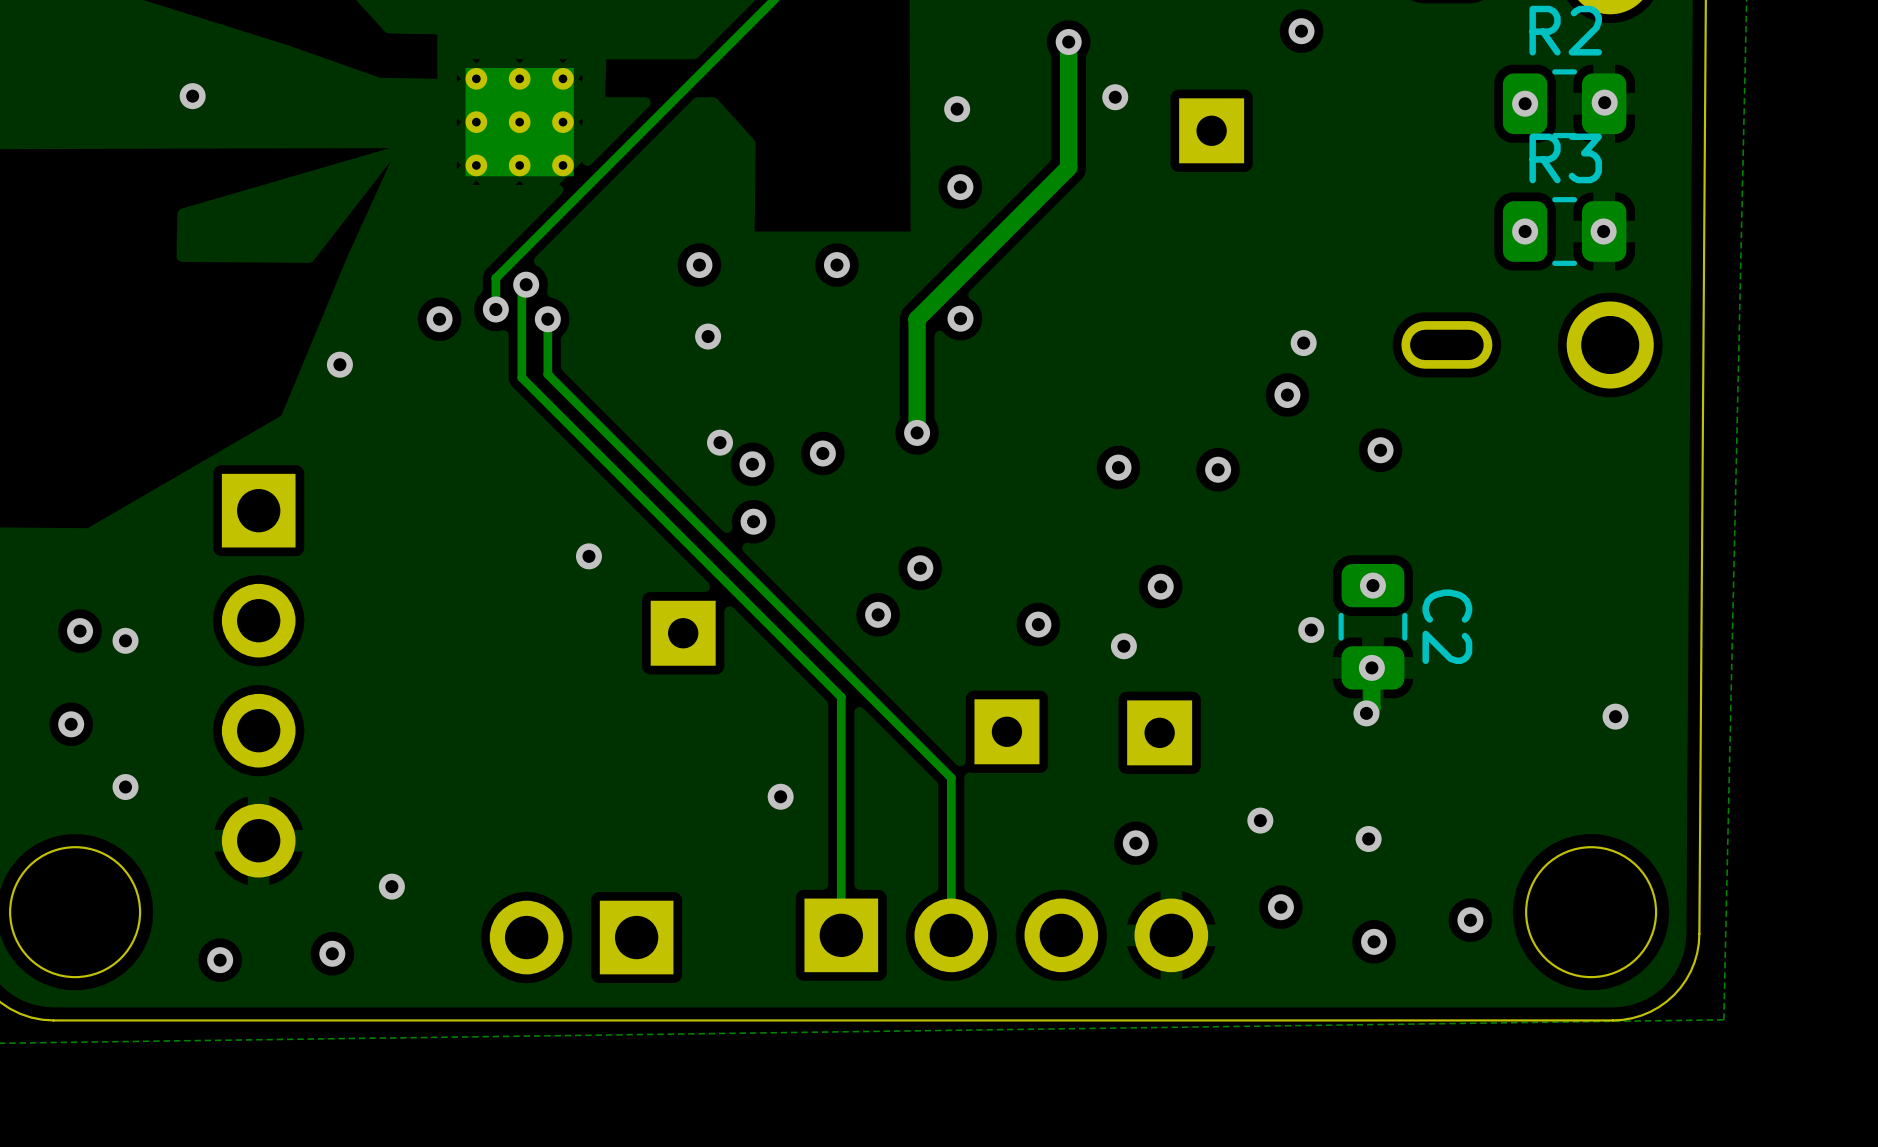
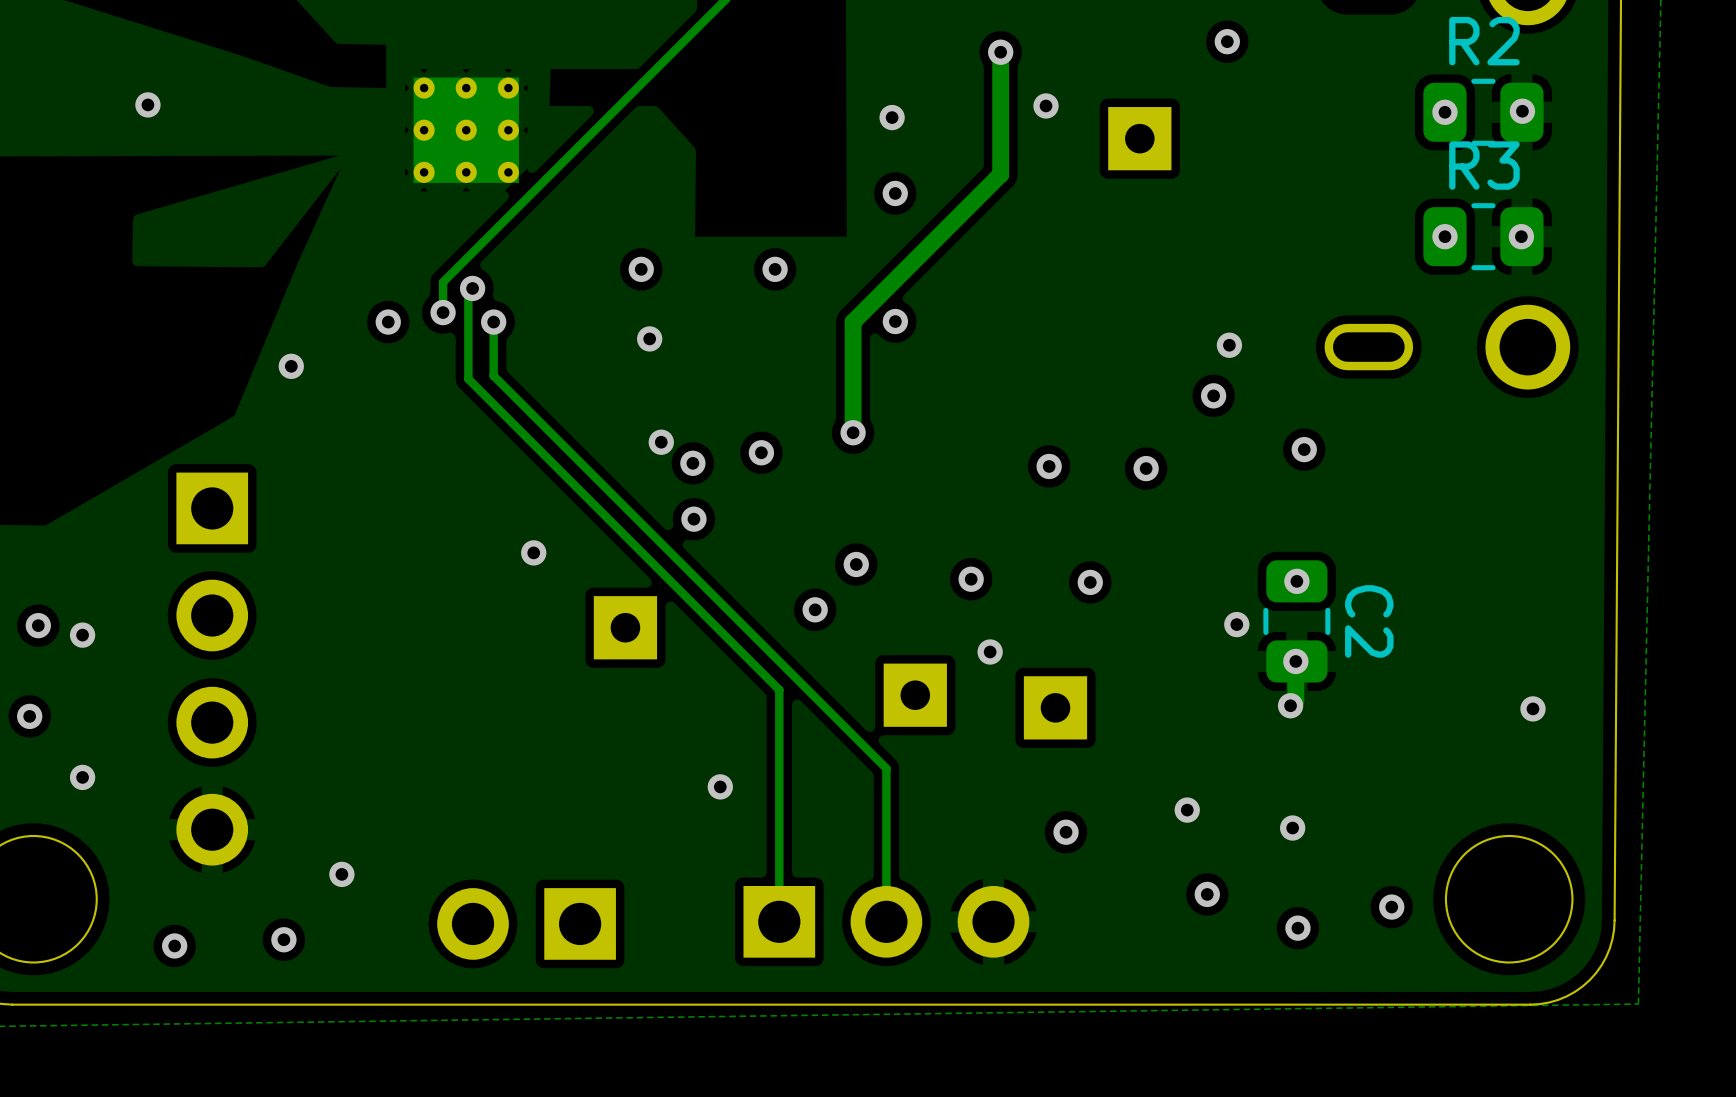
via: none -> (971, 579)
via: (1038, 624) -> none
via: (1123, 646) -> none
via: none -> (990, 651)
part position: (1006, 731) -> (915, 695)
part position: (1159, 732) -> (1055, 707)
part: none -> (886, 921)
part: (1006, 935) -> none

